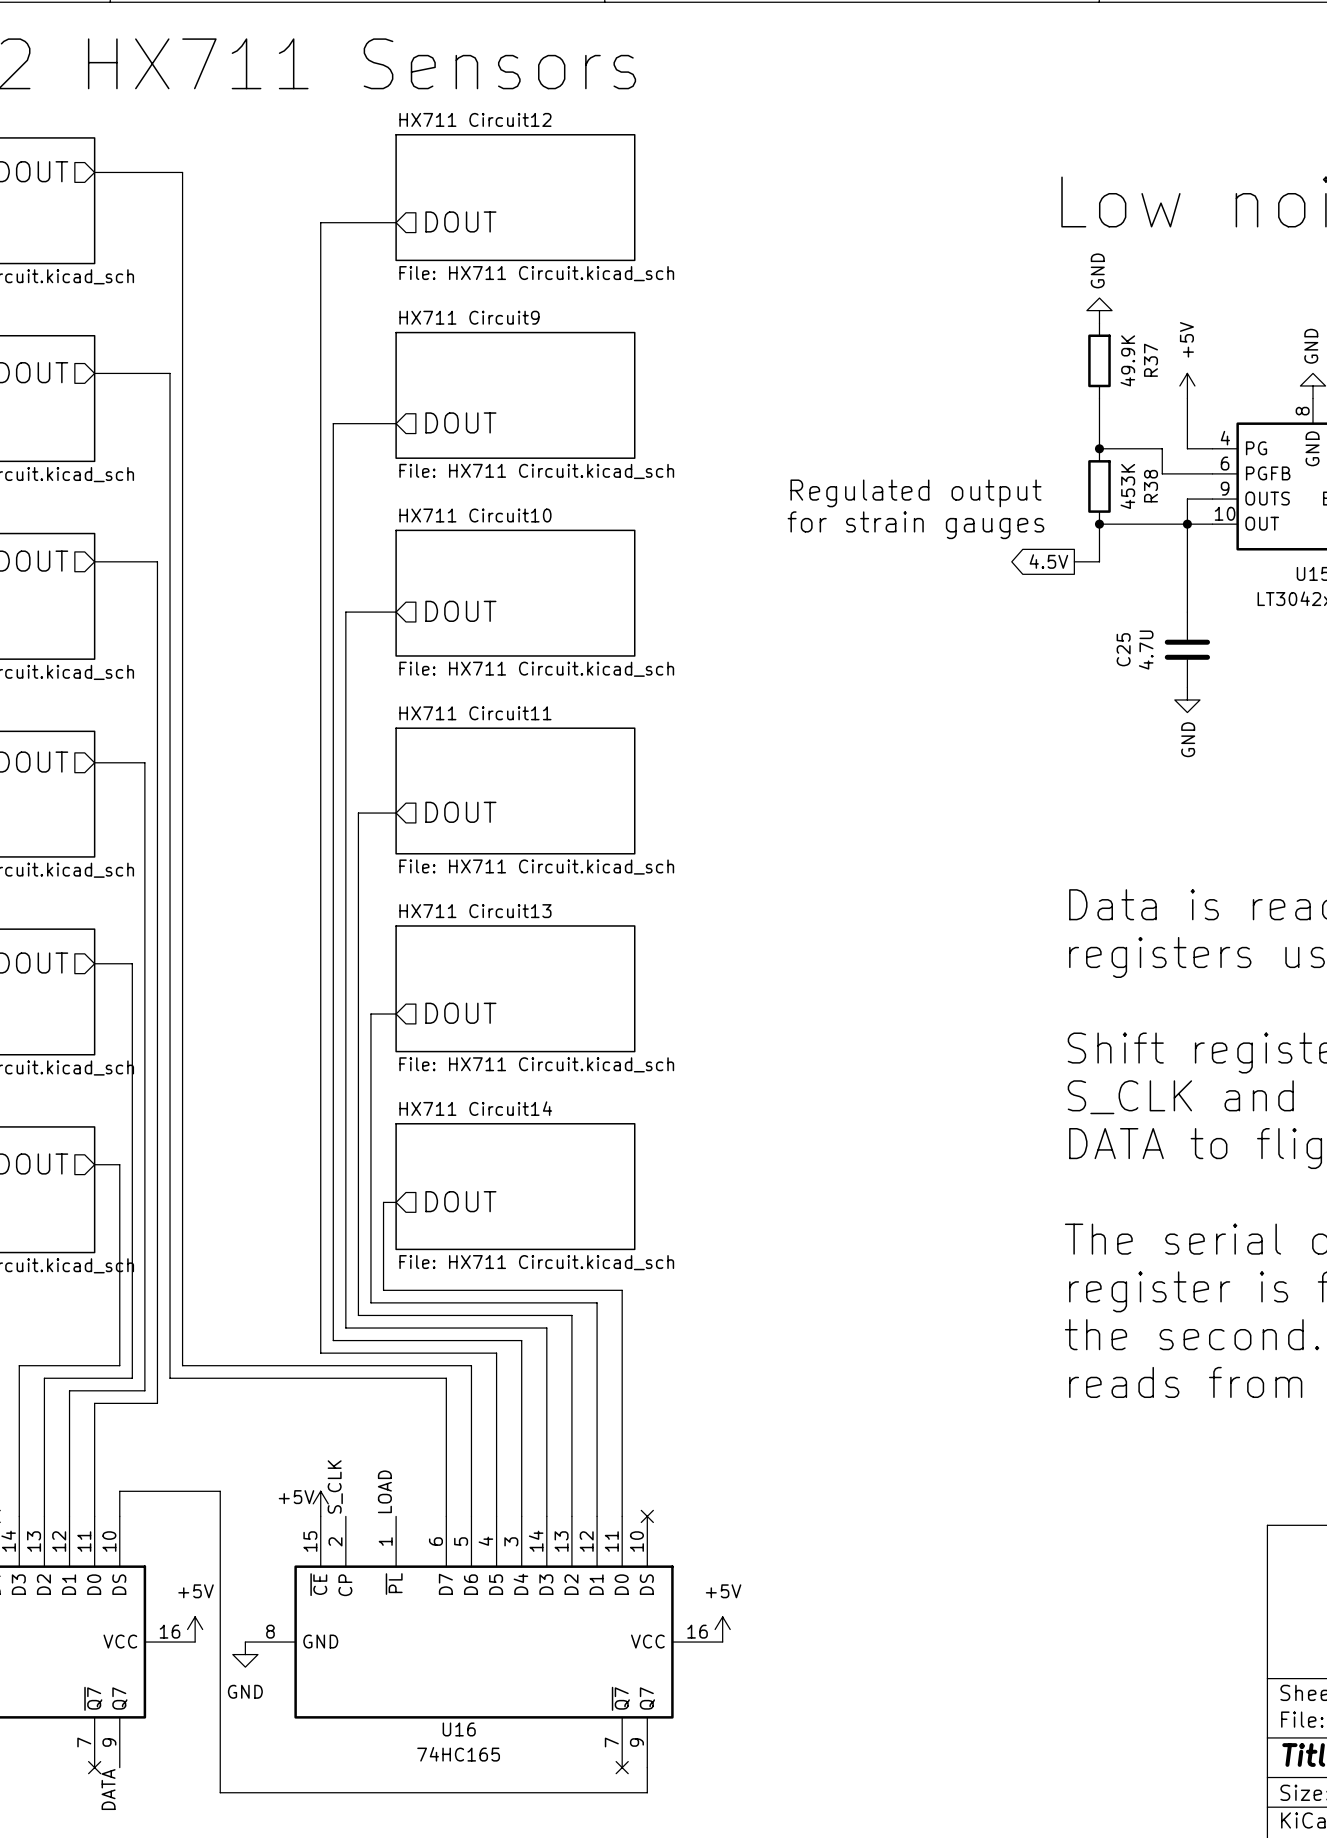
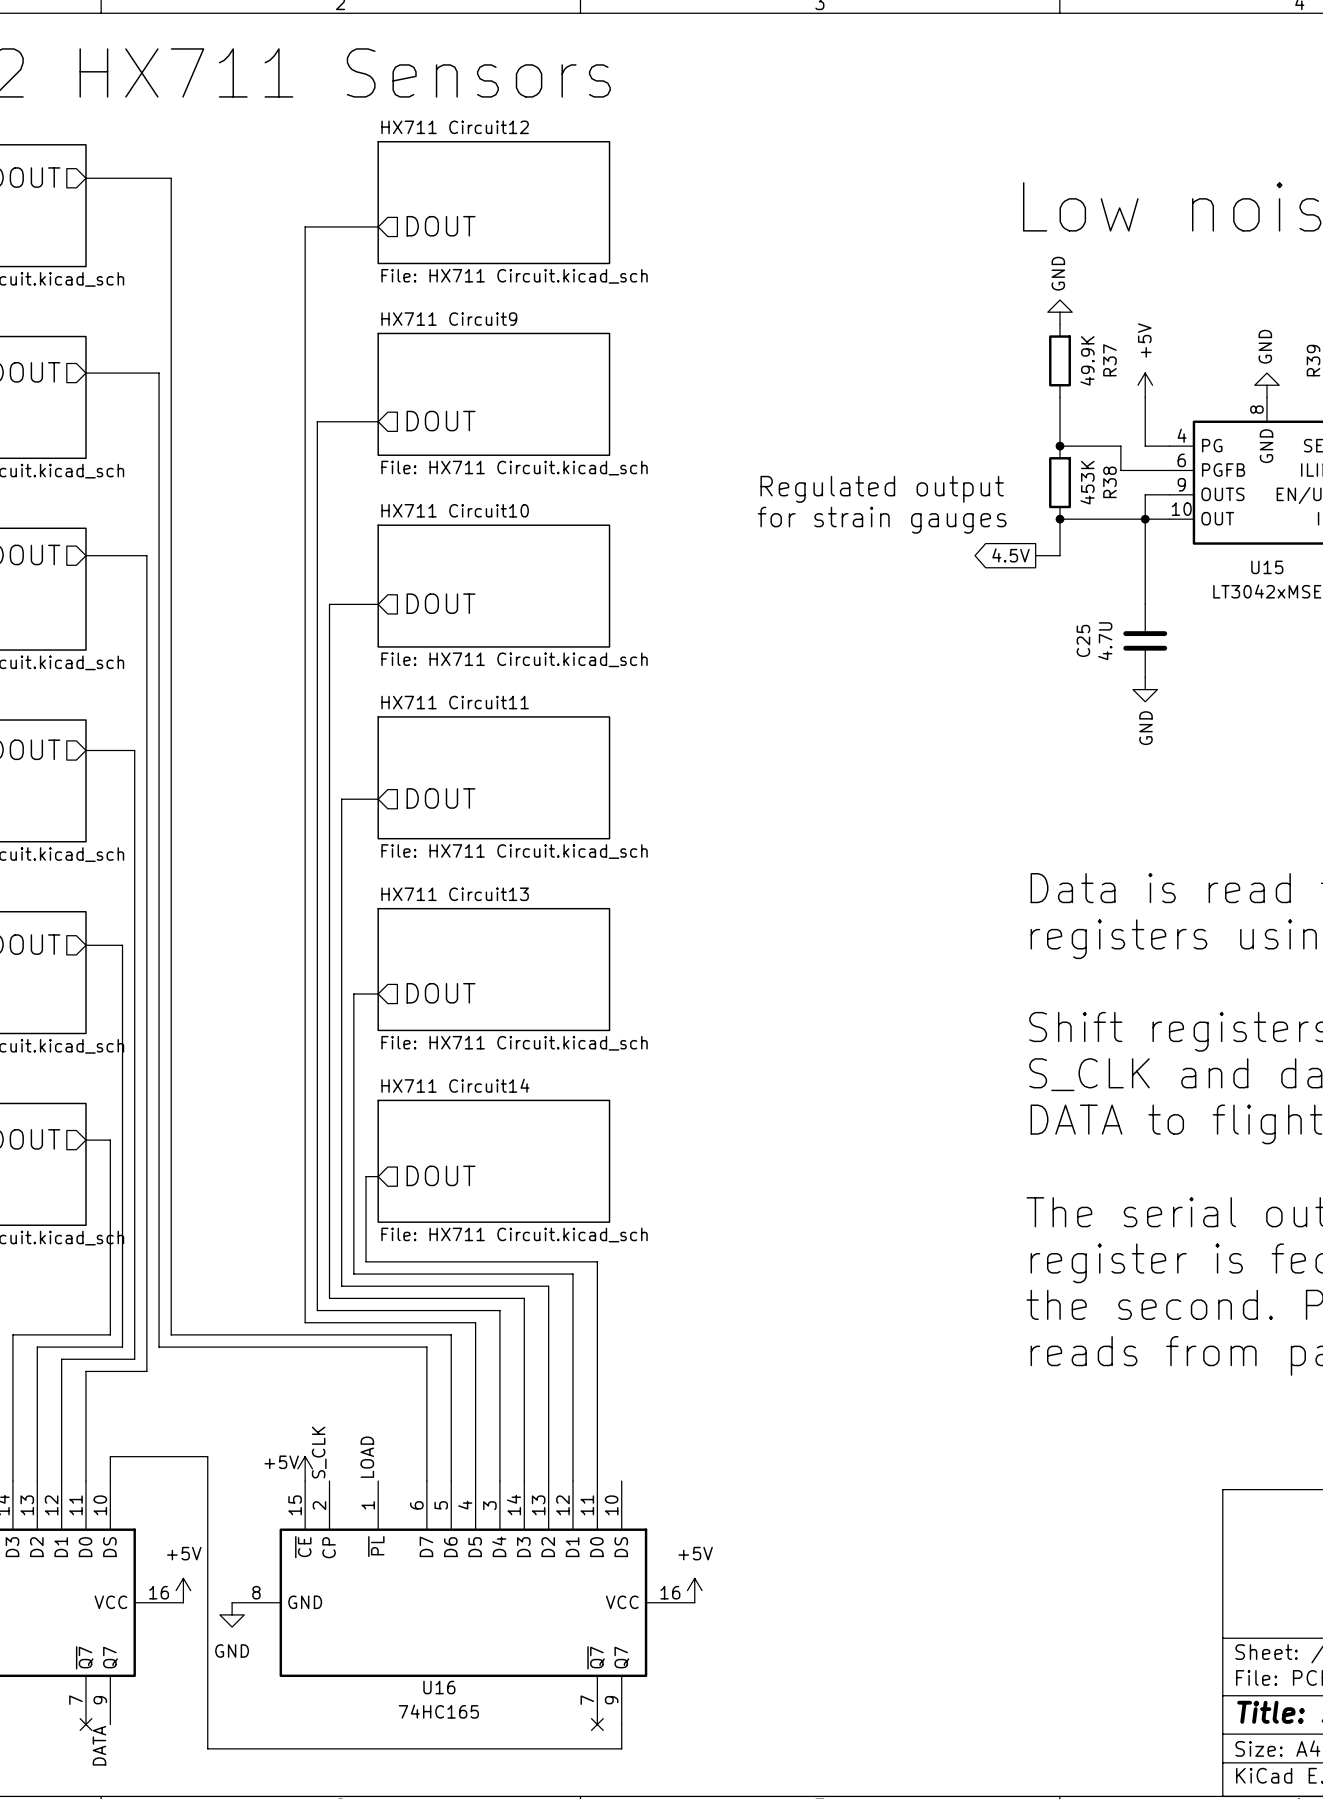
no-connect mark: (647, 1516) -> none

